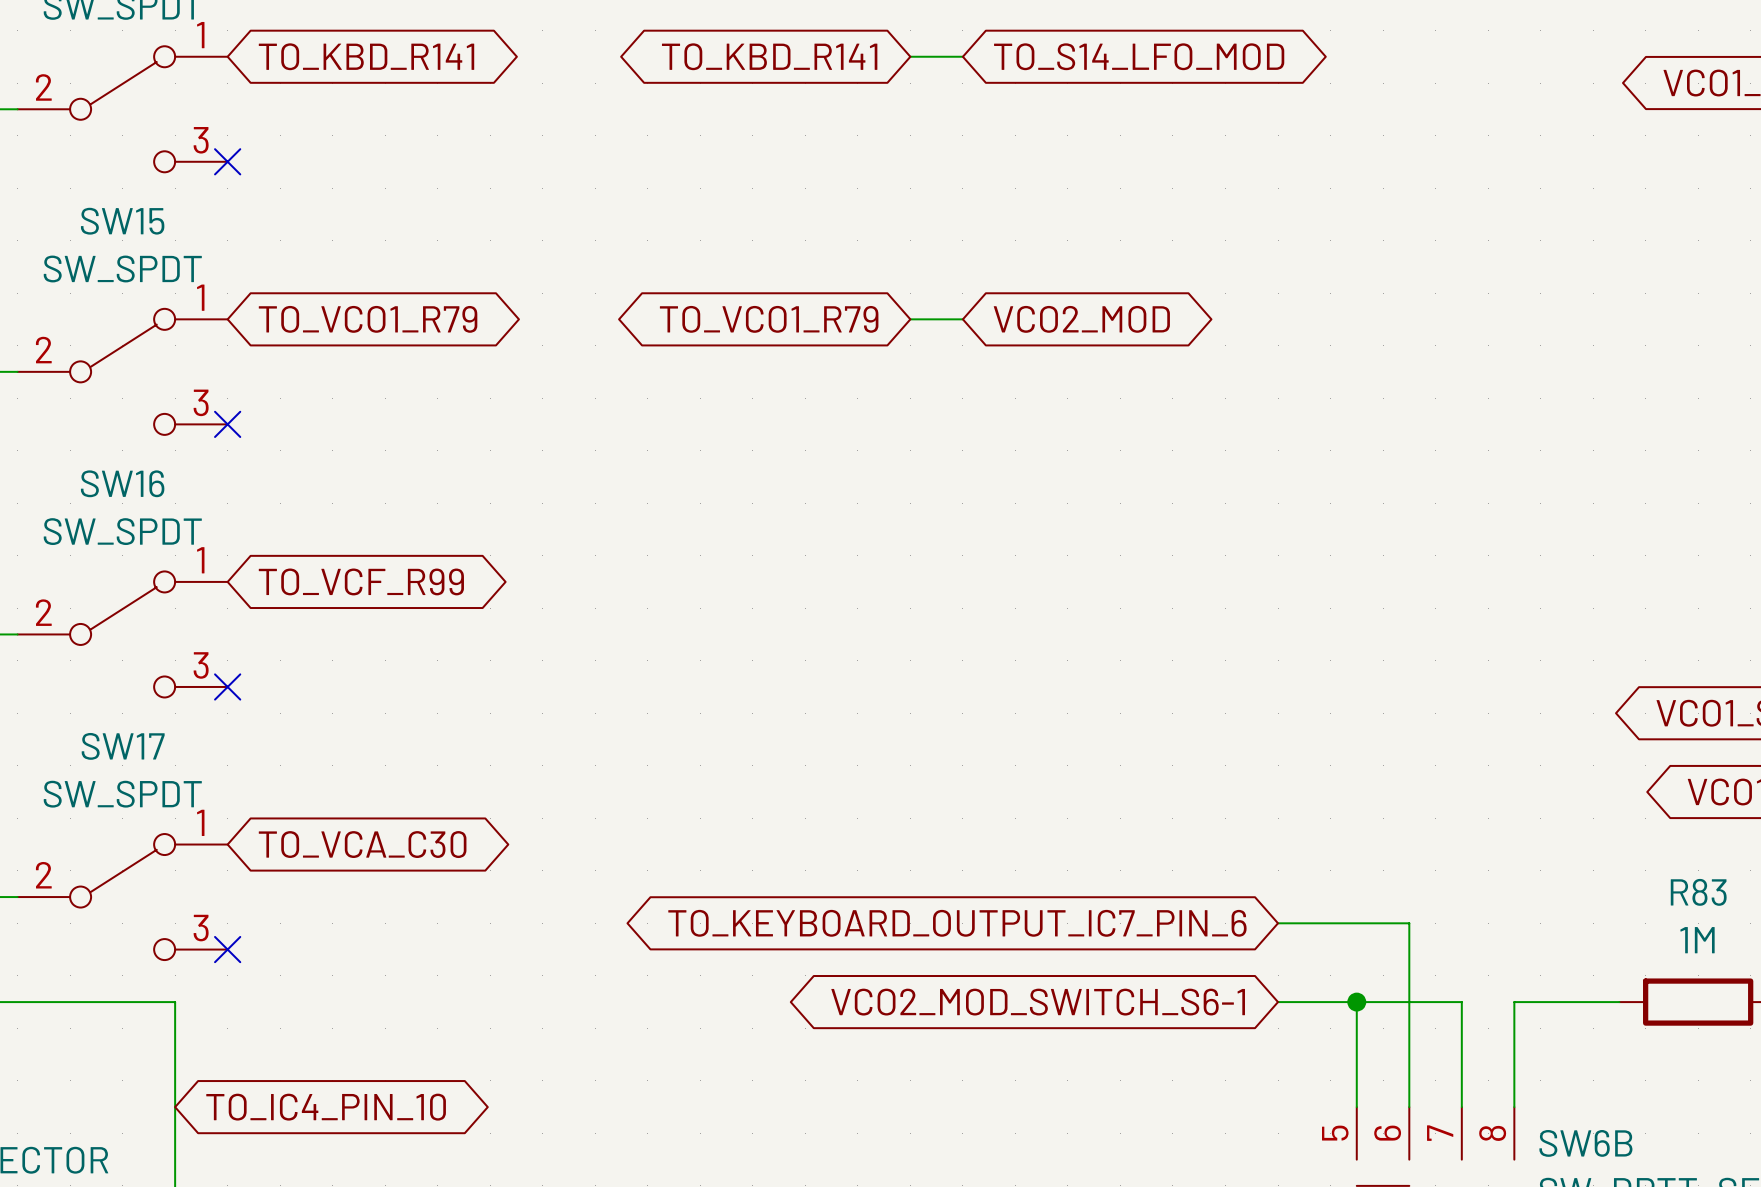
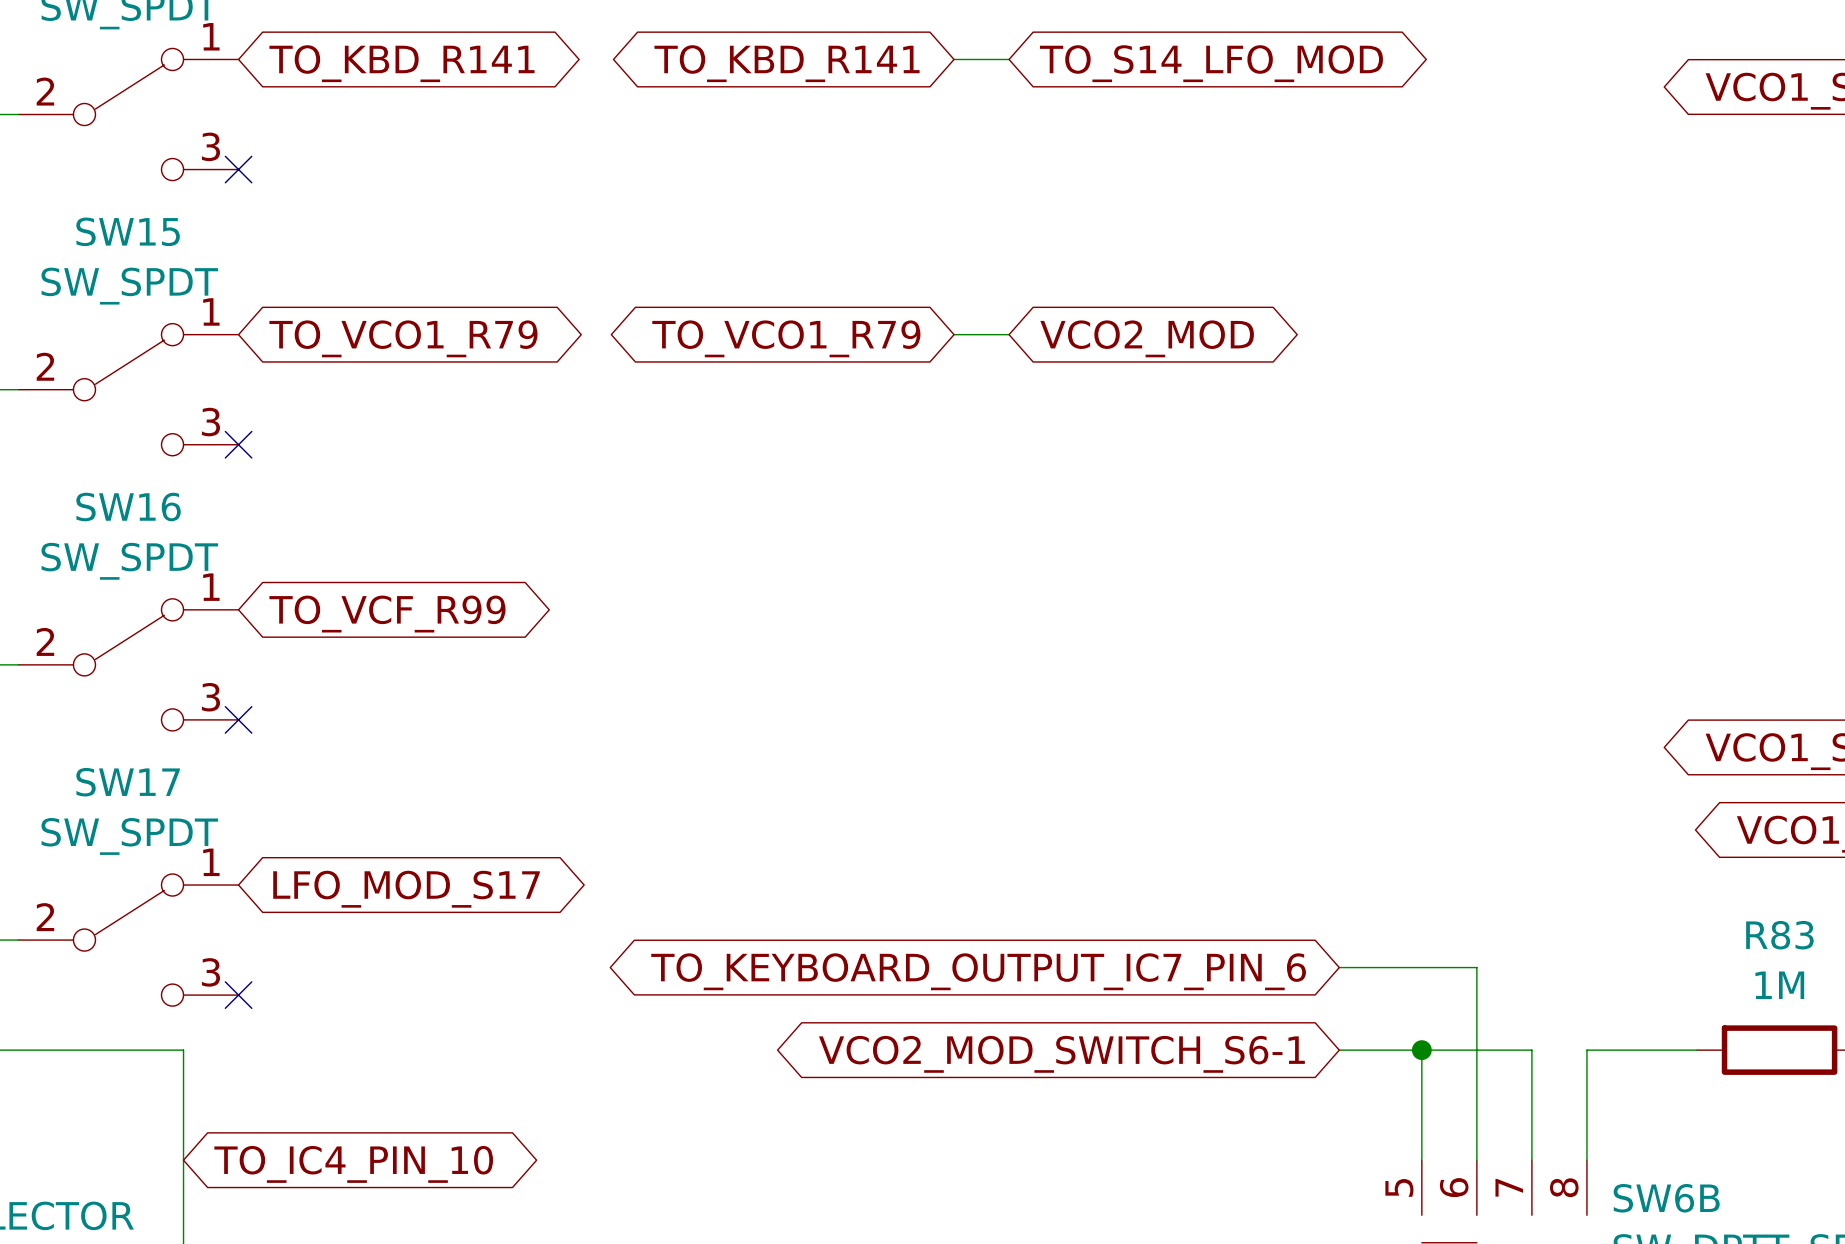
global label: TO_VCA_C30 (362, 844) -> LFO_MOD_S17 (406, 889)

